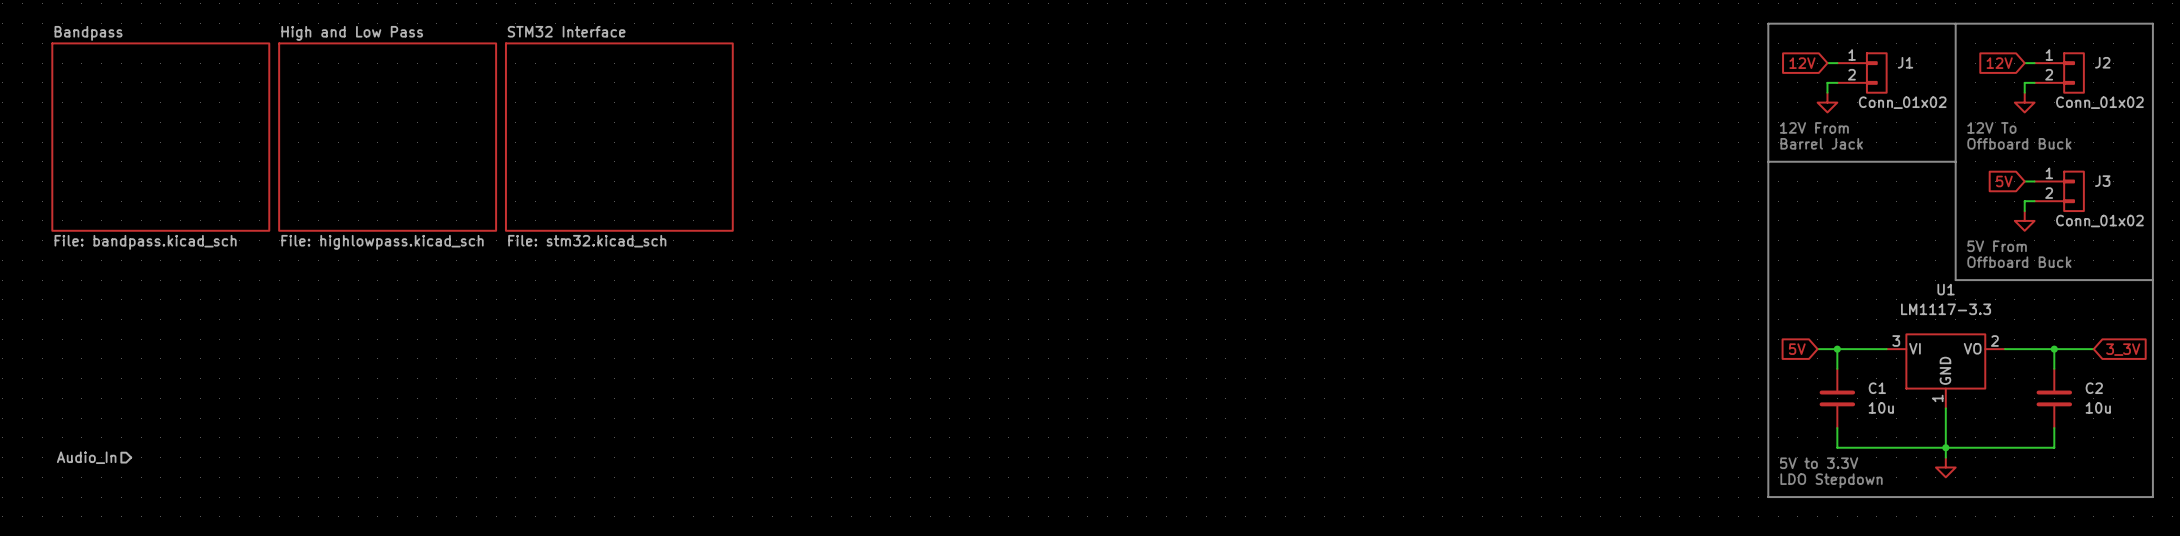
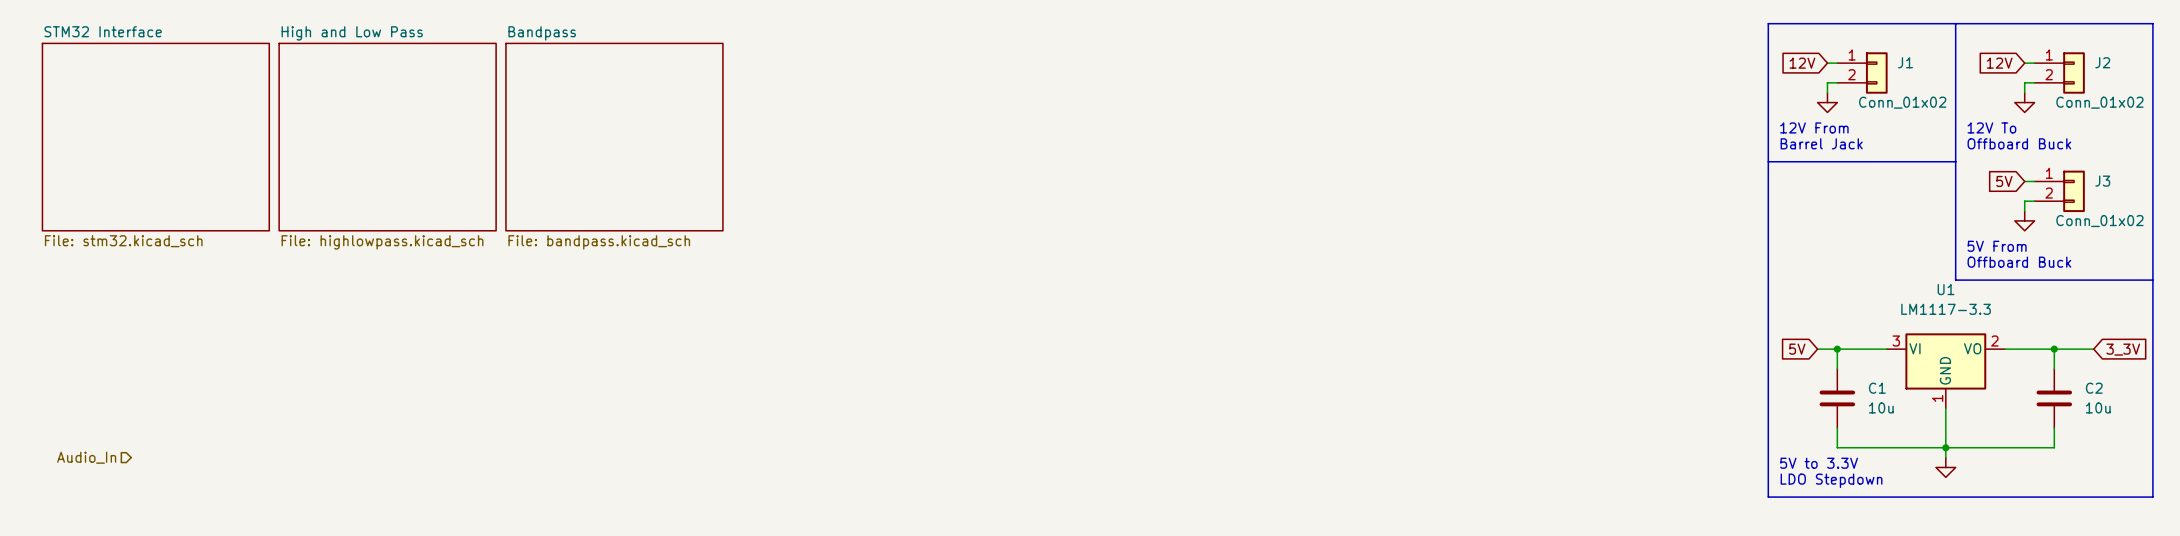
sheet Bandpass: File: bandpass.kicad_sch (160, 137) -> none
sheet Bandpass: none -> File: bandpass.kicad_sch (614, 137)
sheet STM32 Interface position: (619, 137) -> (155, 137)

